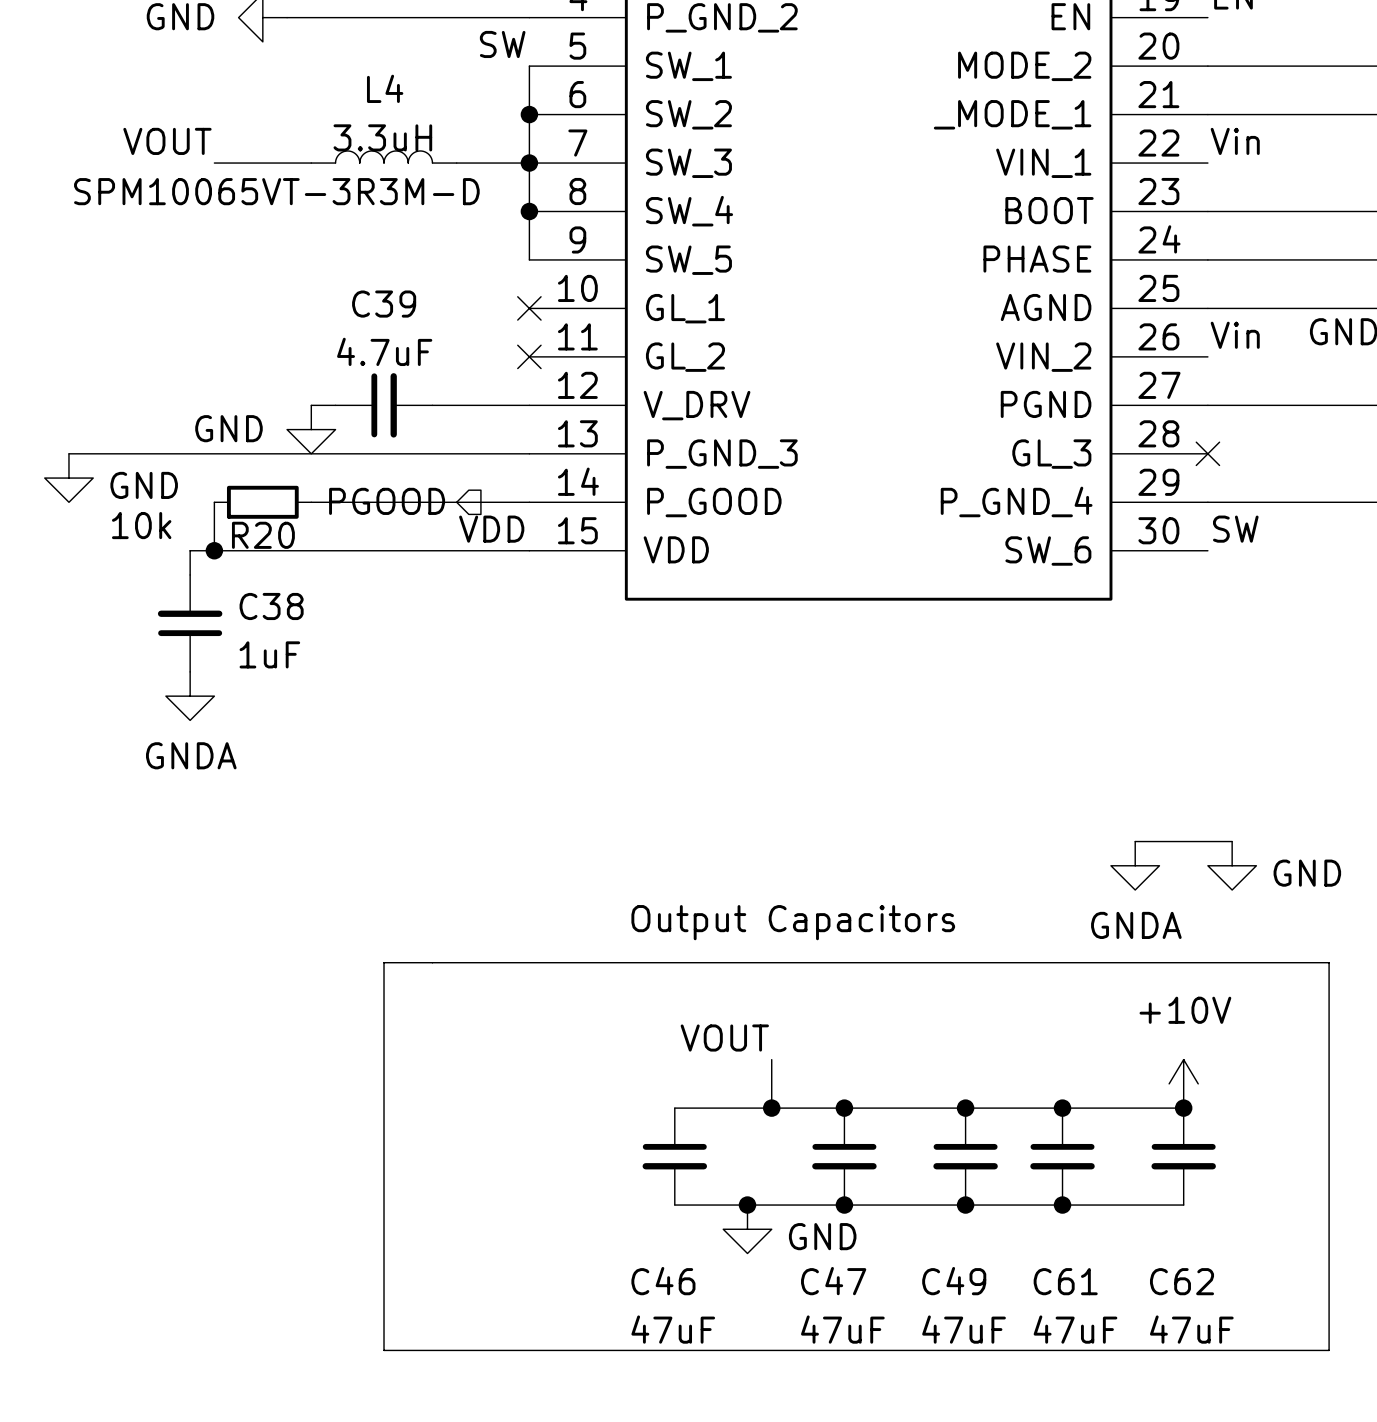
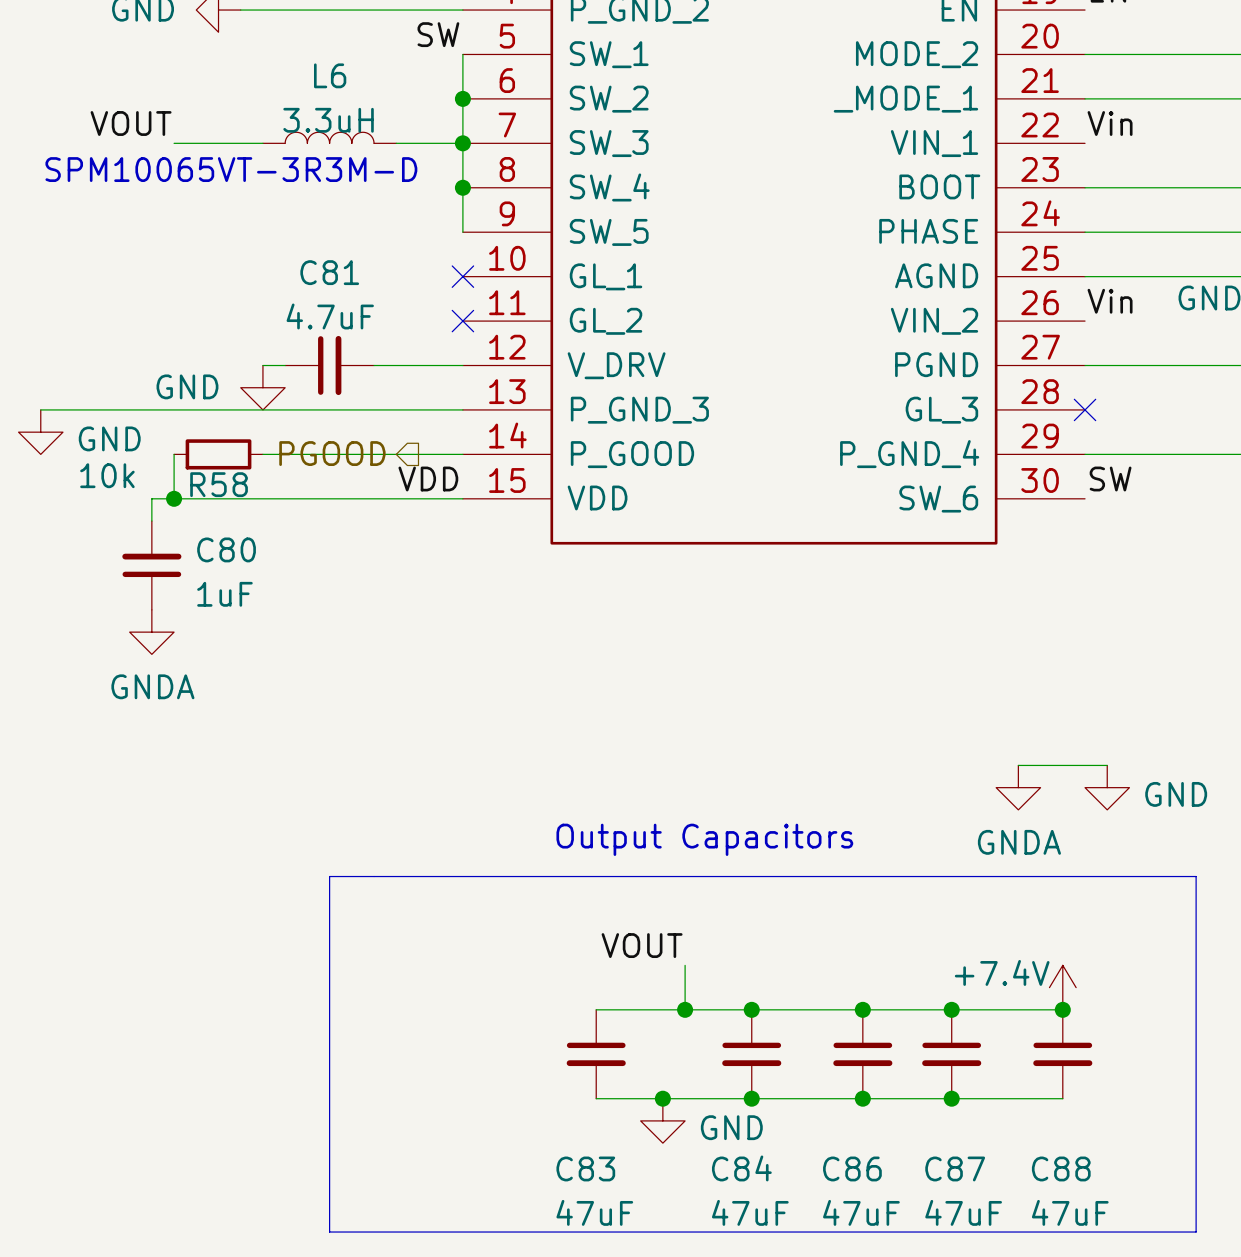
L4 name: L4 (385, 88) -> L6 (330, 75)
C39 name: C39 (384, 304) -> C81 (329, 272)
R20 name: R20 (263, 535) -> R58 (219, 484)
C38 name: C38 (271, 606) -> C80 (226, 549)
power symbol: +10V (1183, 1083) -> +7.4V (1062, 987)
C46 name: C46 (663, 1281) -> C83 (585, 1168)
C47 name: C47 (833, 1281) -> C84 (741, 1168)
C49 name: C49 (954, 1281) -> C86 (852, 1168)
C61 name: C61 (1065, 1281) -> C87 (955, 1168)
C62 name: C62 (1182, 1281) -> C88 (1061, 1168)

